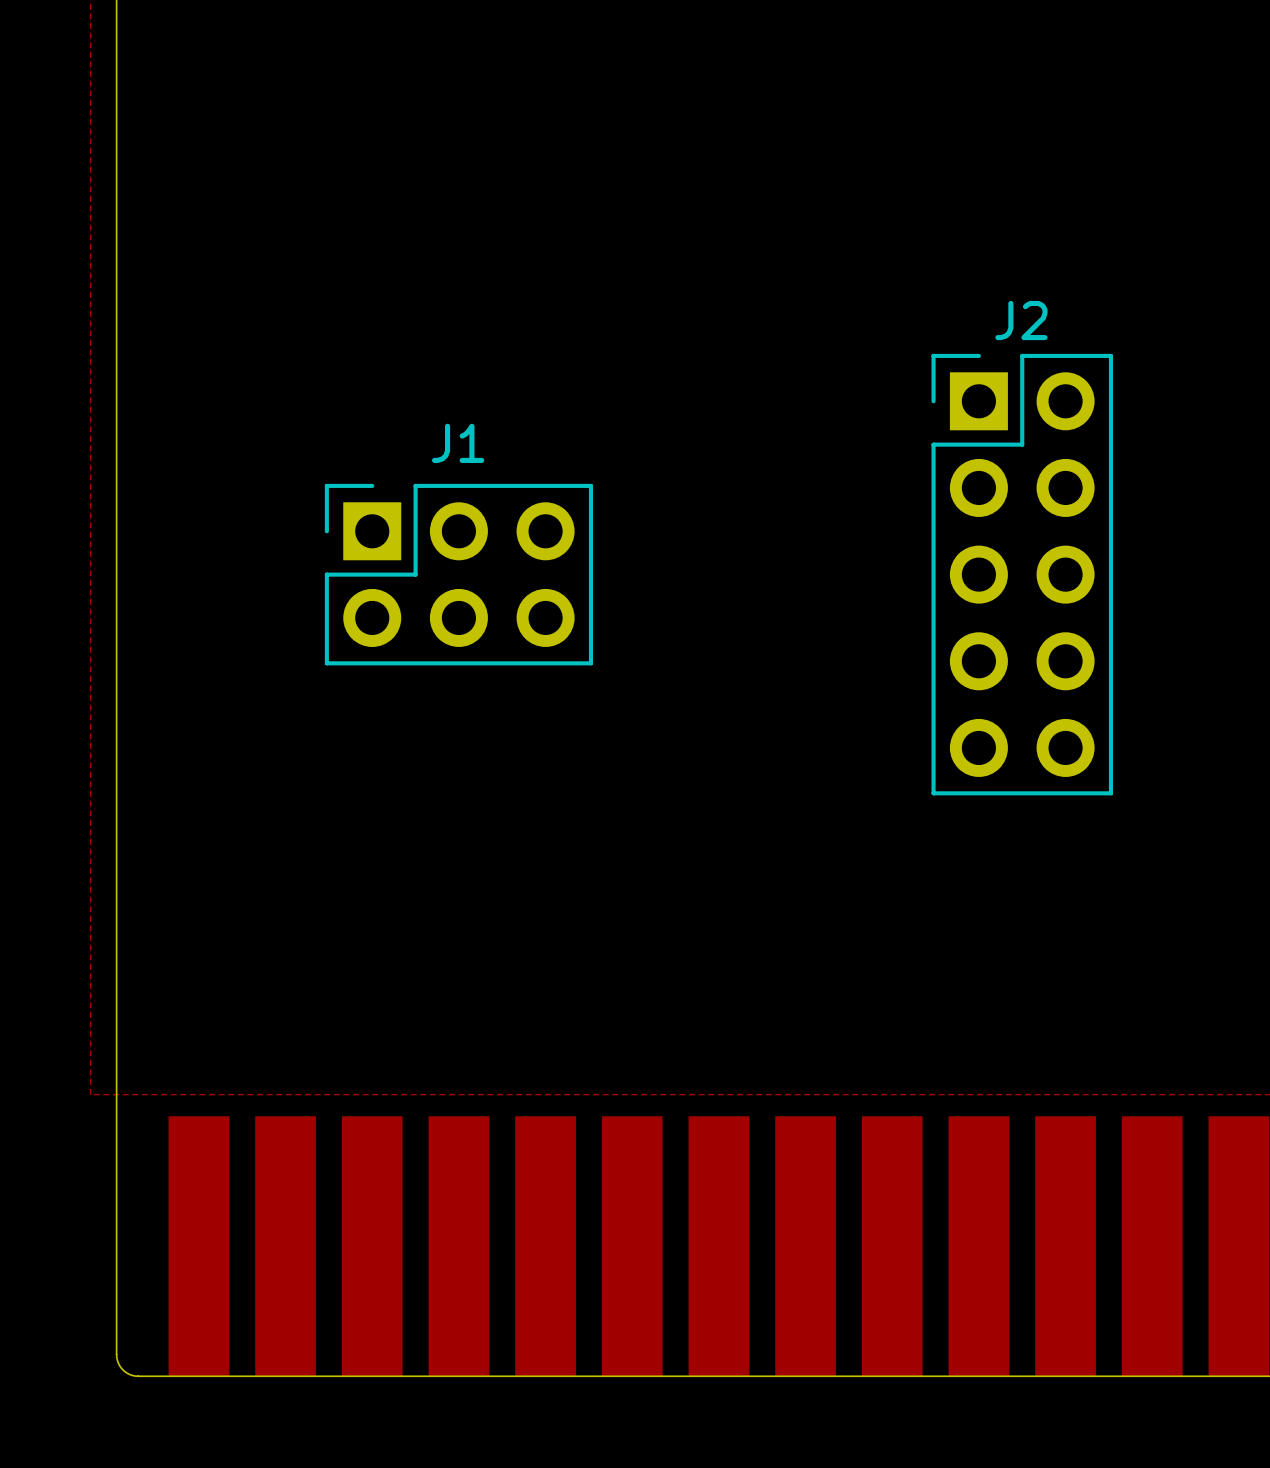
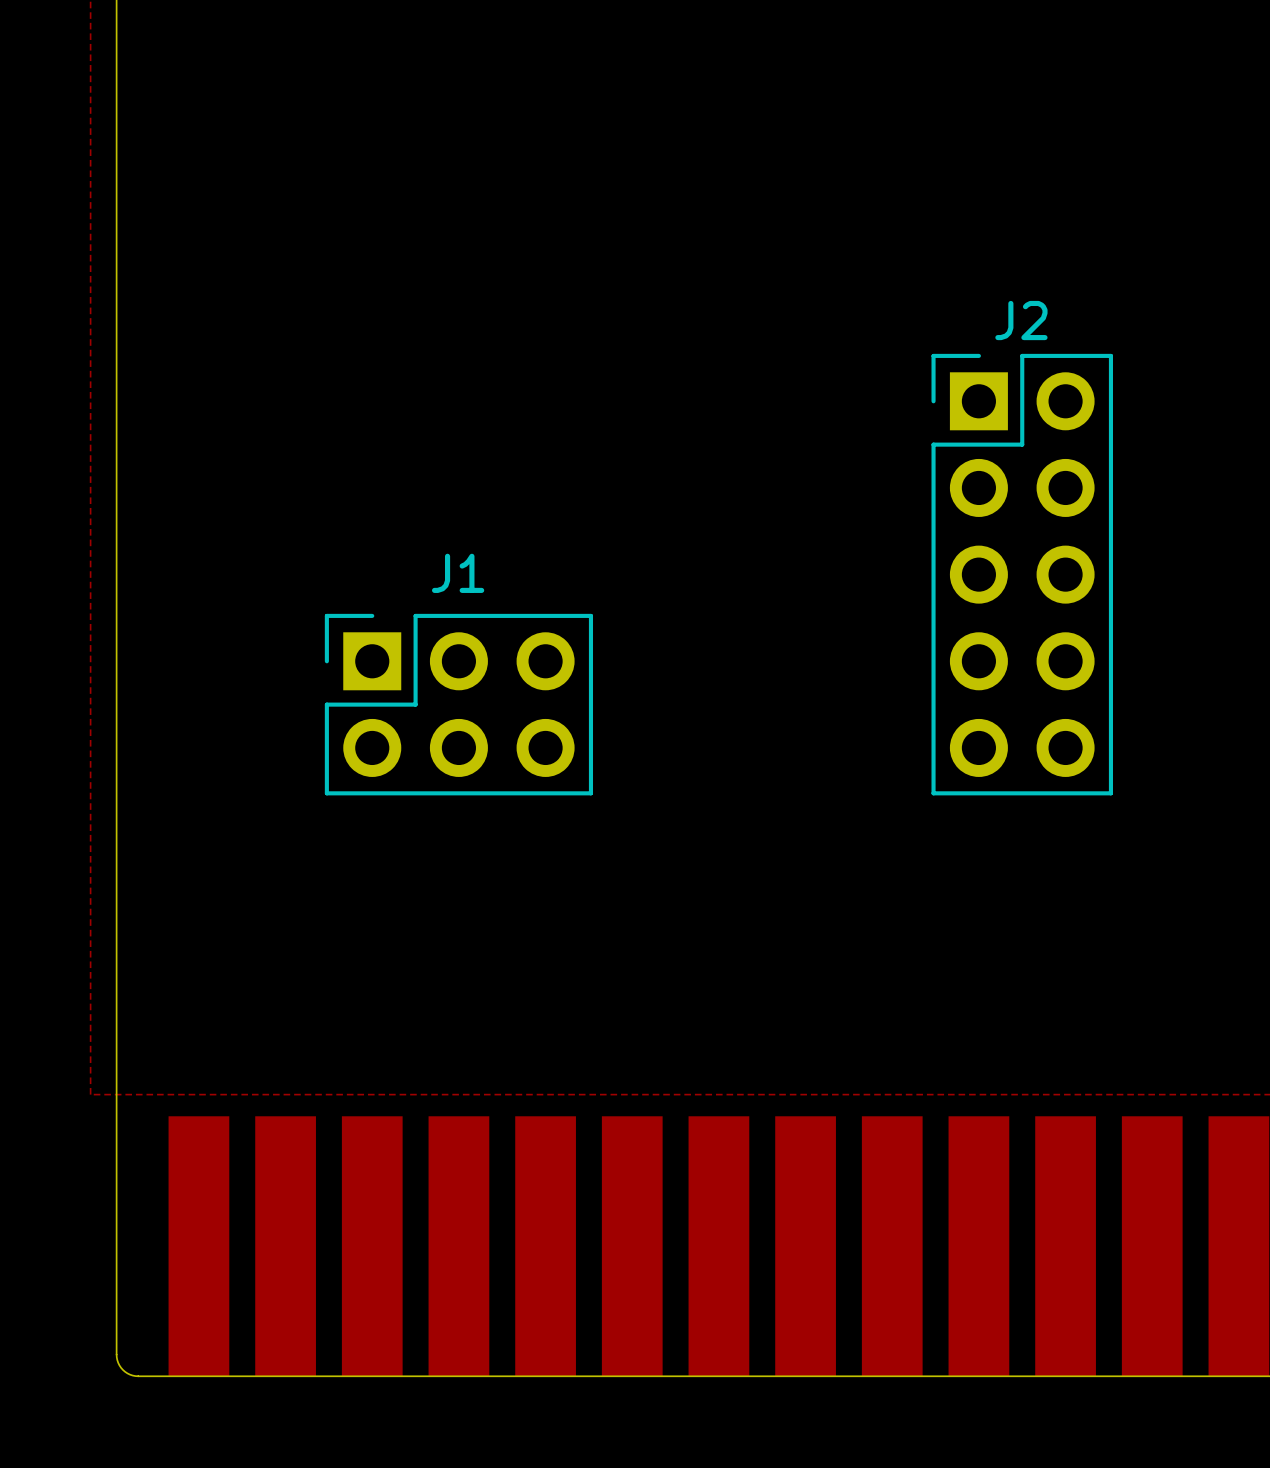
J1 position: (458, 574) -> (458, 704)

